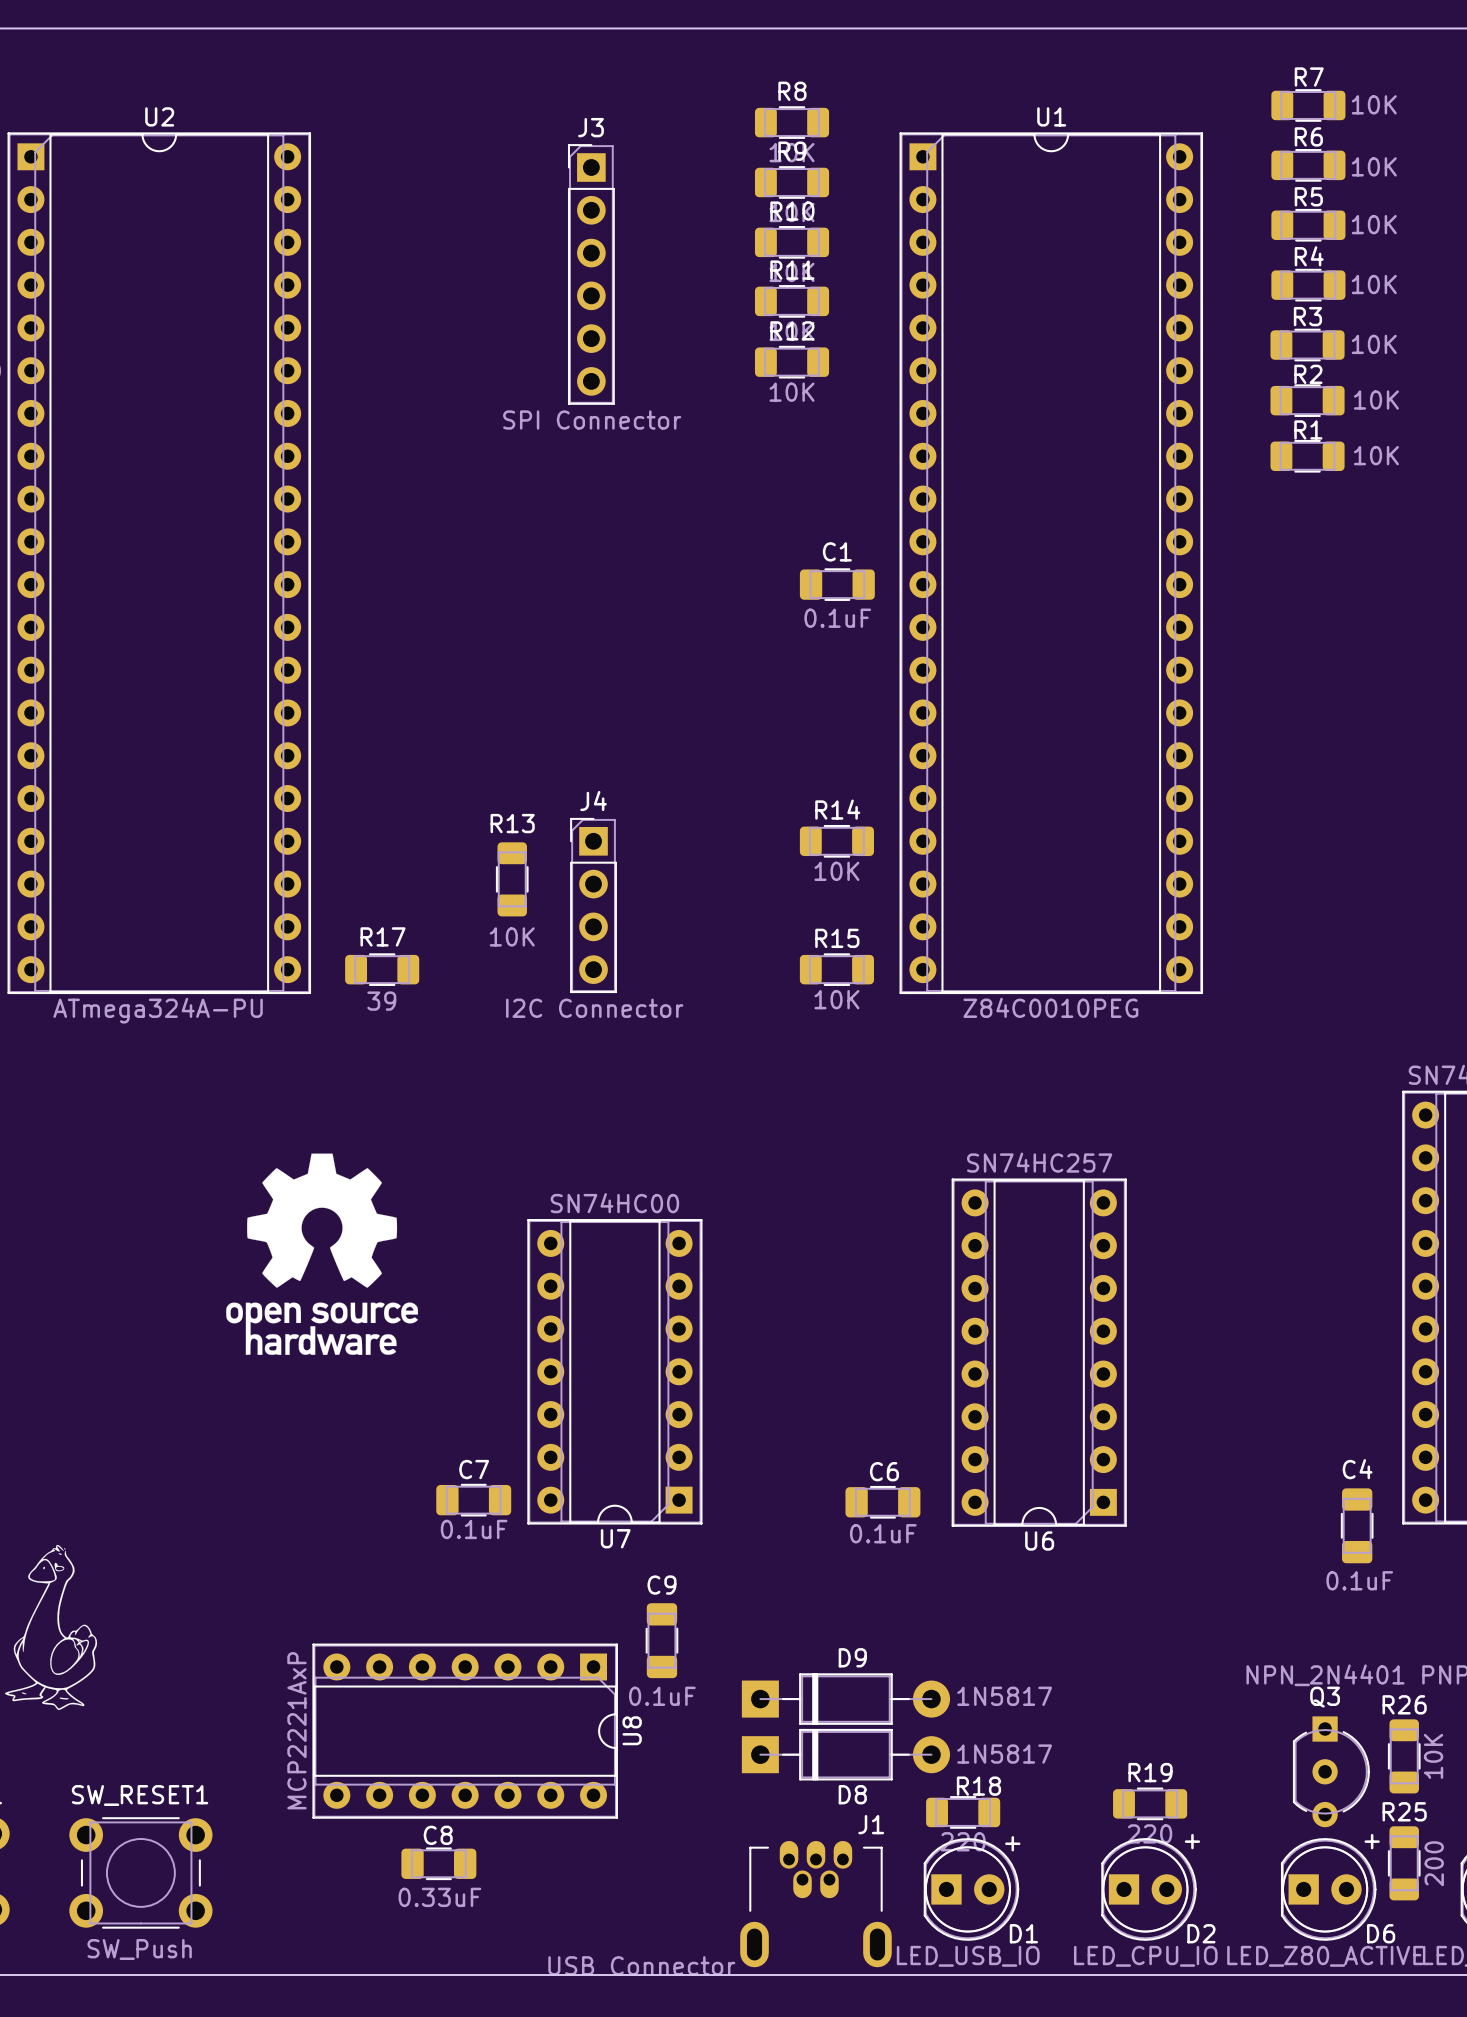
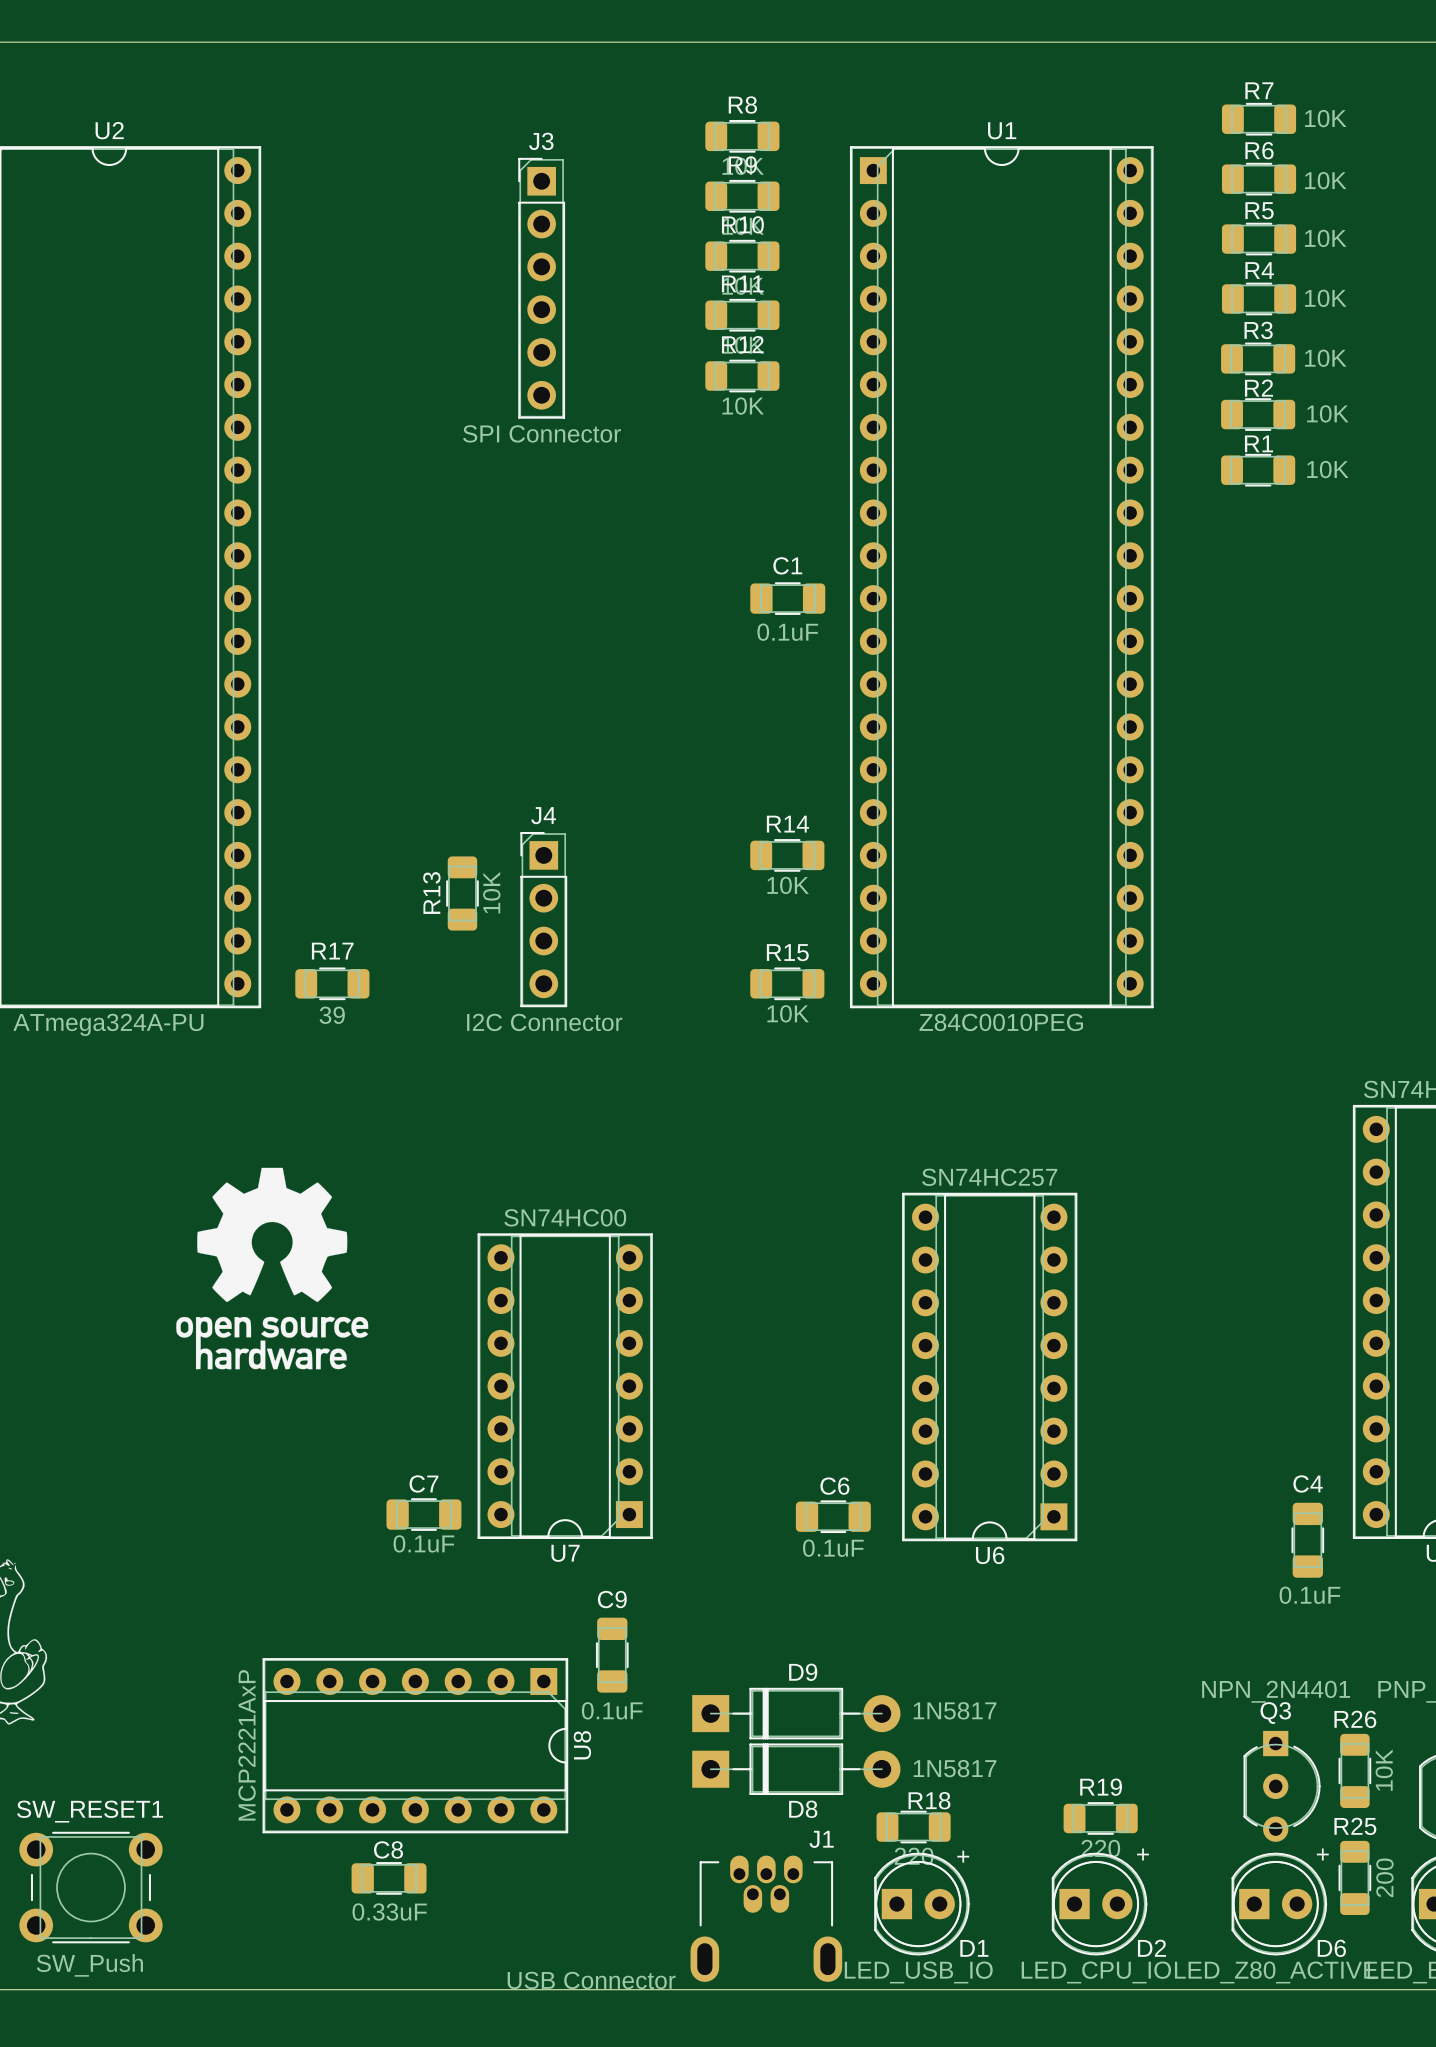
R13 name rotation: 0° (512, 823) -> 90° counterclockwise (431, 893)
R13 name position: R13 (512, 823) -> R13 (431, 893)
R13 value rotation: 0° (512, 936) -> 90° counterclockwise (491, 892)
R13 value position: 10K (512, 936) -> 10K (491, 892)

